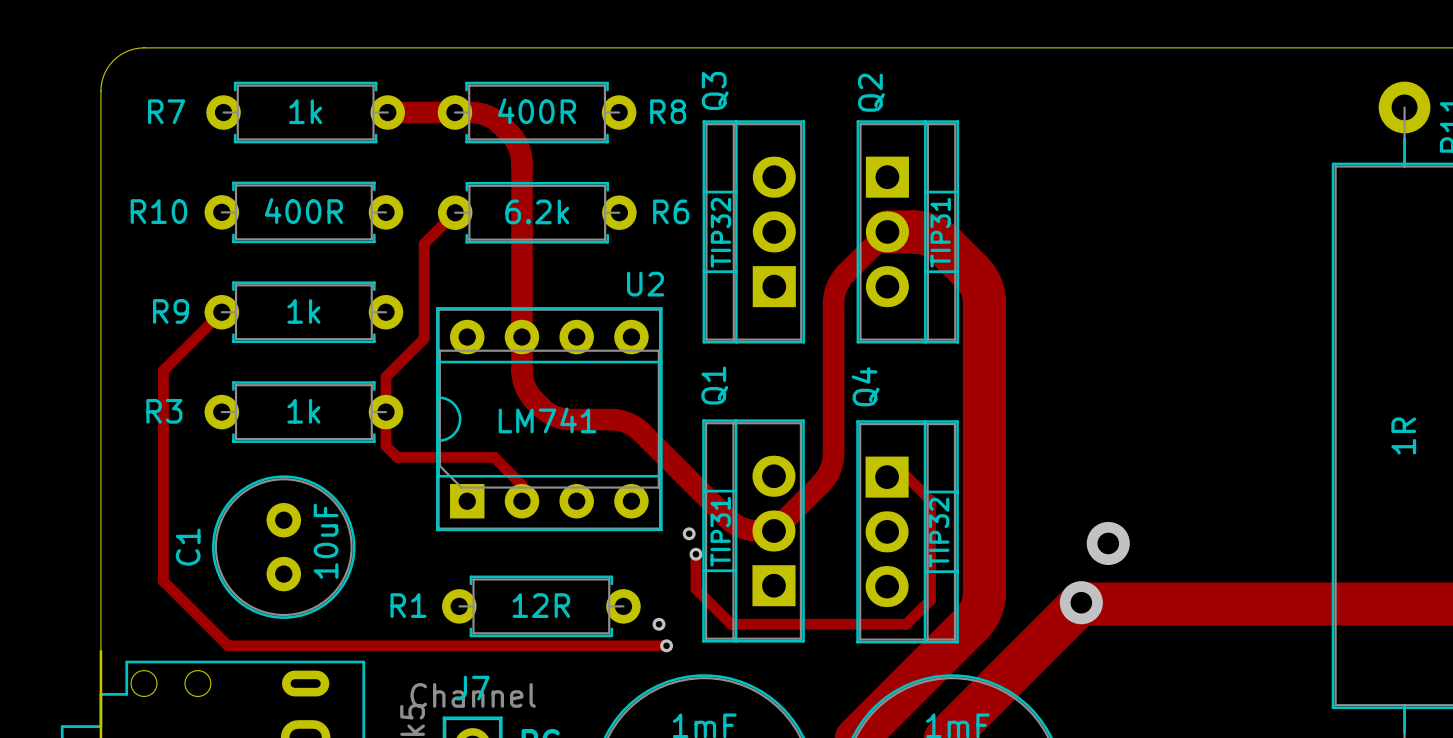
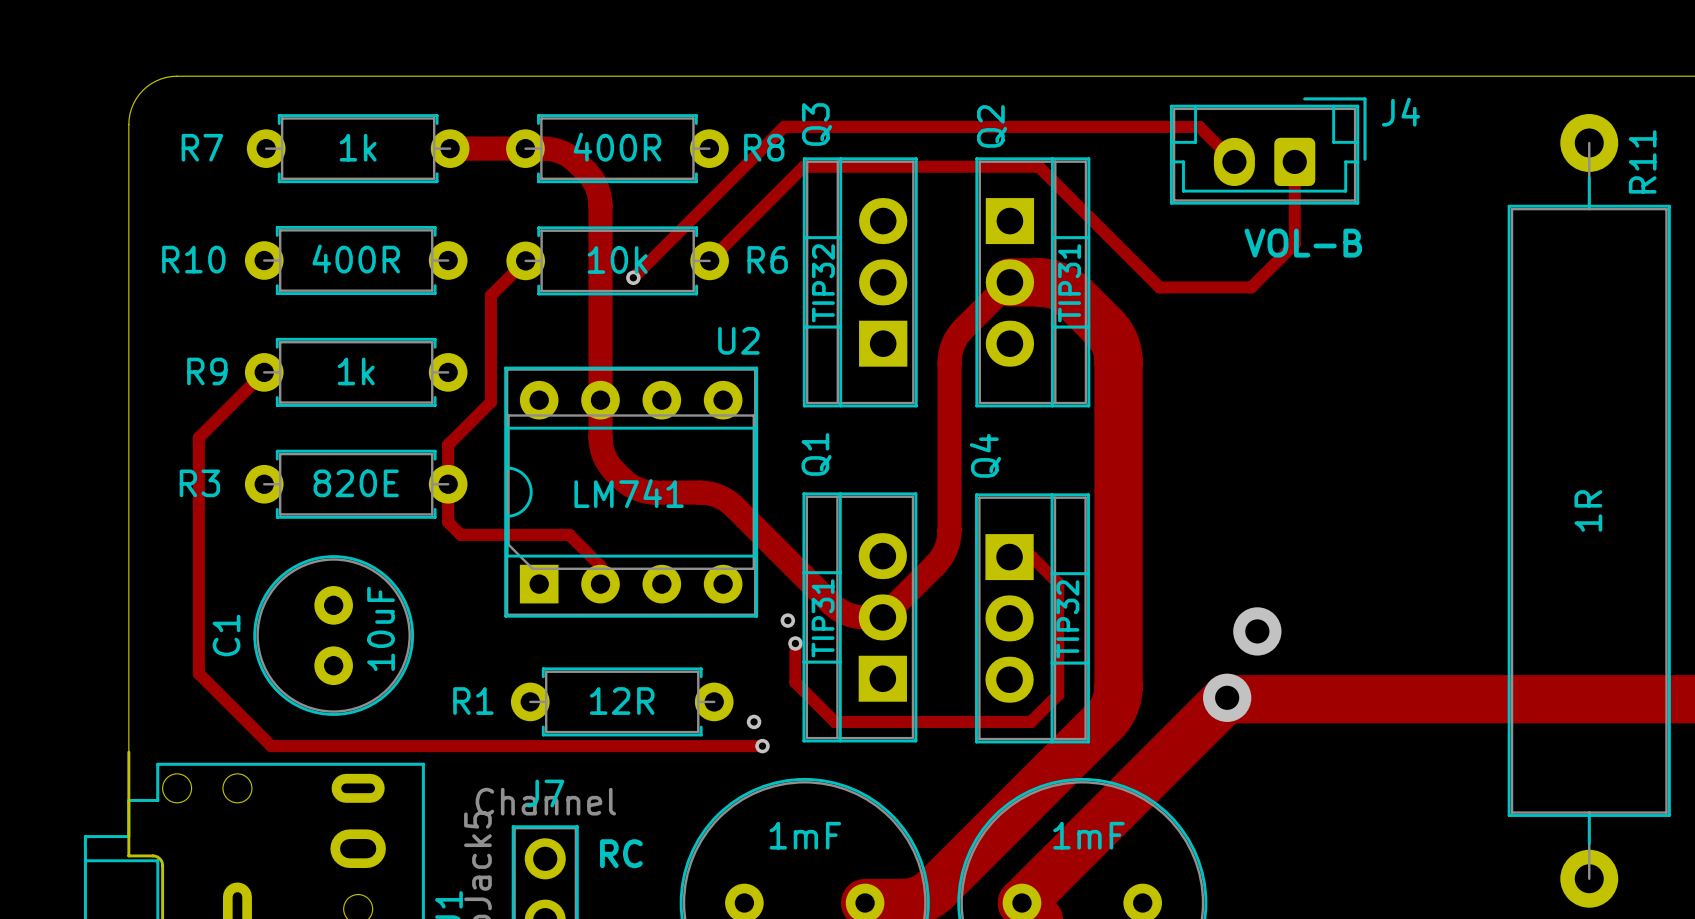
J4: none -> VOL-B (1268, 151)
track: none -> (1234, 161) (1199, 126) (784, 126) (633, 277)
track: none -> (1294, 161) (1294, 243) (1251, 287) (1159, 287) (1038, 166) (803, 166) (709, 260)
R6 value: 6.2k (537, 211) -> 10k (617, 259)
via: none -> (633, 277)
R3 value: 1k (303, 411) -> 820E (356, 483)

